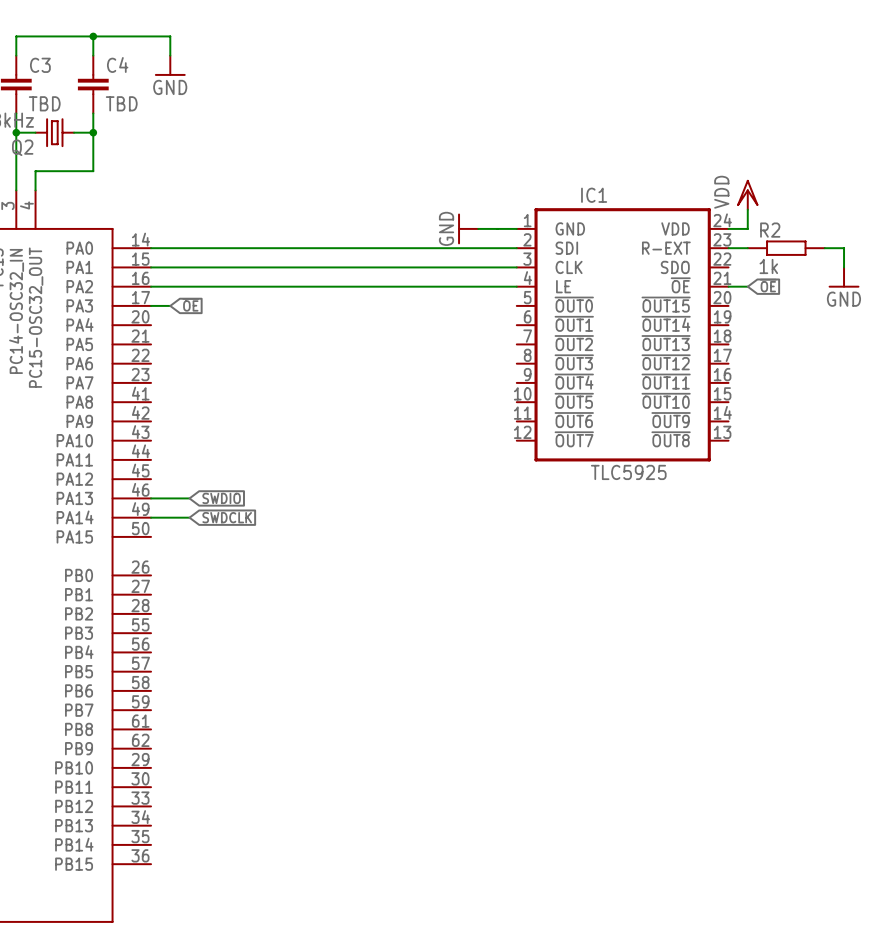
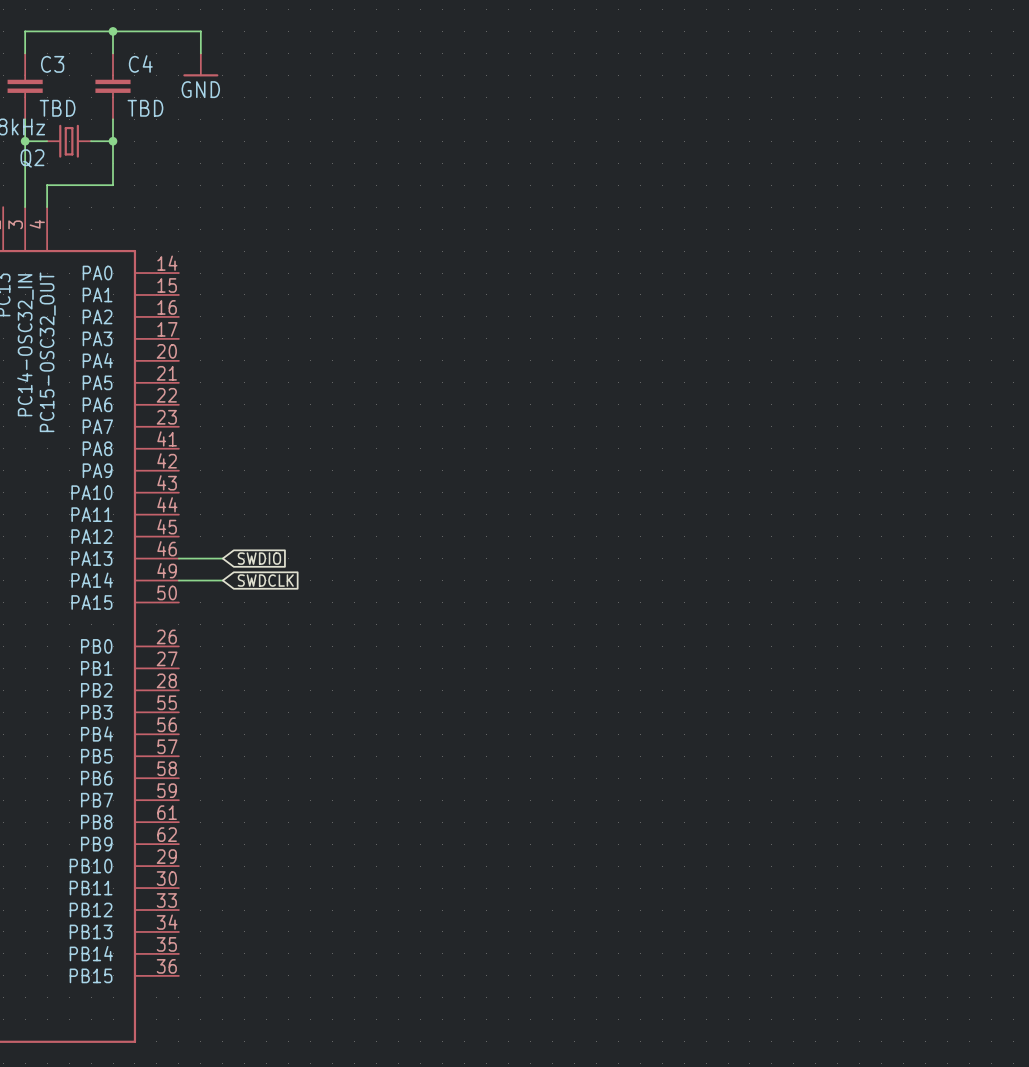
power symbol: VDD (747, 194) -> none
wire: (747, 209) (747, 228) (728, 228) -> none
power symbol: GND (468, 228) -> none
wire: (478, 228) (516, 228) -> none
wire: (151, 248) (516, 248) -> none
wire: (728, 248) (747, 248) -> none
R2: 1k (786, 248) -> none
wire: (824, 248) (844, 248) (844, 267) -> none
wire: (151, 267) (516, 267) -> none
power symbol: GND (844, 277) -> none
global label: ~{OE} (768, 285) -> none
wire: (151, 286) (516, 286) -> none
wire: (728, 286) (747, 286) -> none
global label: ~{OE} (190, 304) -> none
wire: (151, 305) (170, 305) -> none
IC1: TLC5925 (622, 334) -> none

